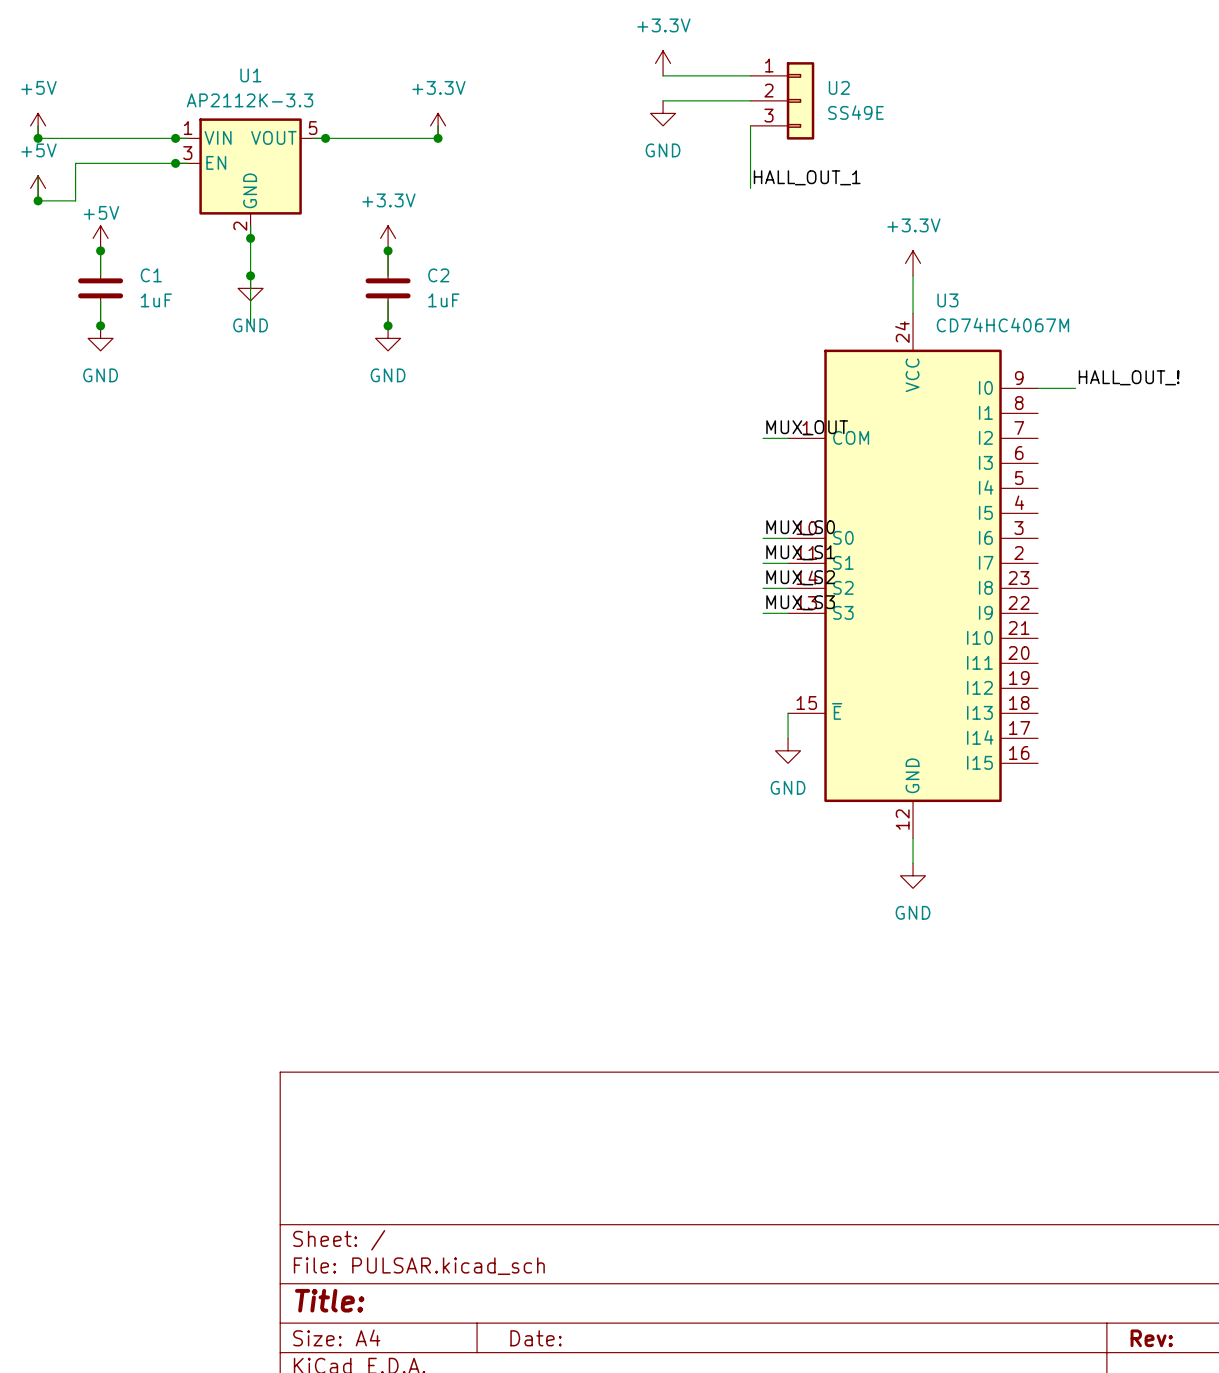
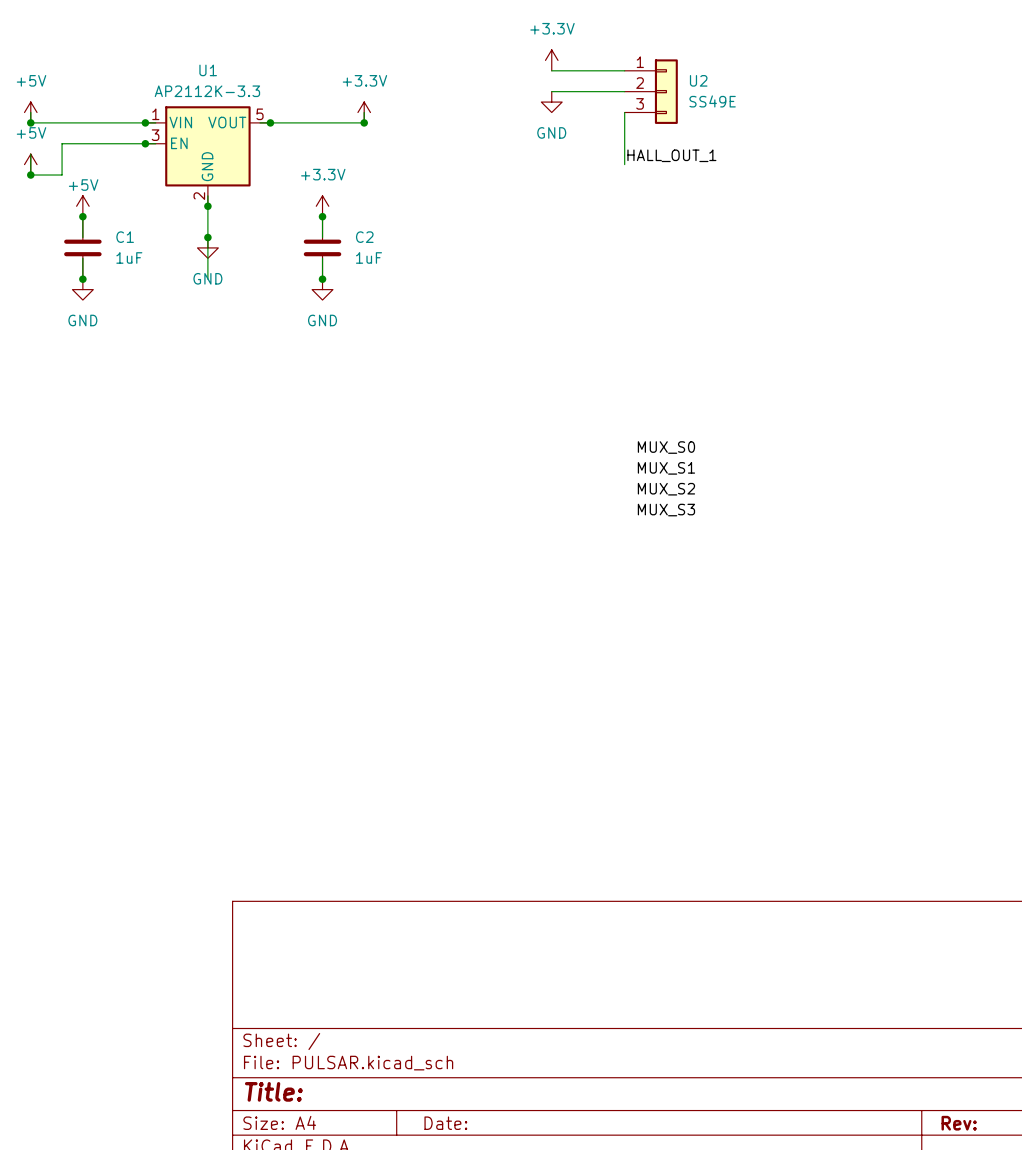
power symbol: +3.3V (913, 263) -> none
wire: (913, 275) (913, 313) -> none
label: HALL_OUT_! (1129, 377) -> none
wire: (1038, 388) (1075, 388) -> none
label: MUX_OUT (807, 427) -> none
wire: (763, 438) (788, 438) -> none
wire: (763, 538) (788, 538) -> none
wire: (763, 563) (788, 563) -> none
U3: CD74HC4067M (913, 575) -> none
wire: (763, 588) (788, 588) -> none
wire: (763, 613) (788, 613) -> none
wire: (788, 713) (788, 738) -> none
power symbol: GND (788, 750) -> none
wire: (913, 838) (913, 863) -> none
power symbol: GND (913, 875) -> none

